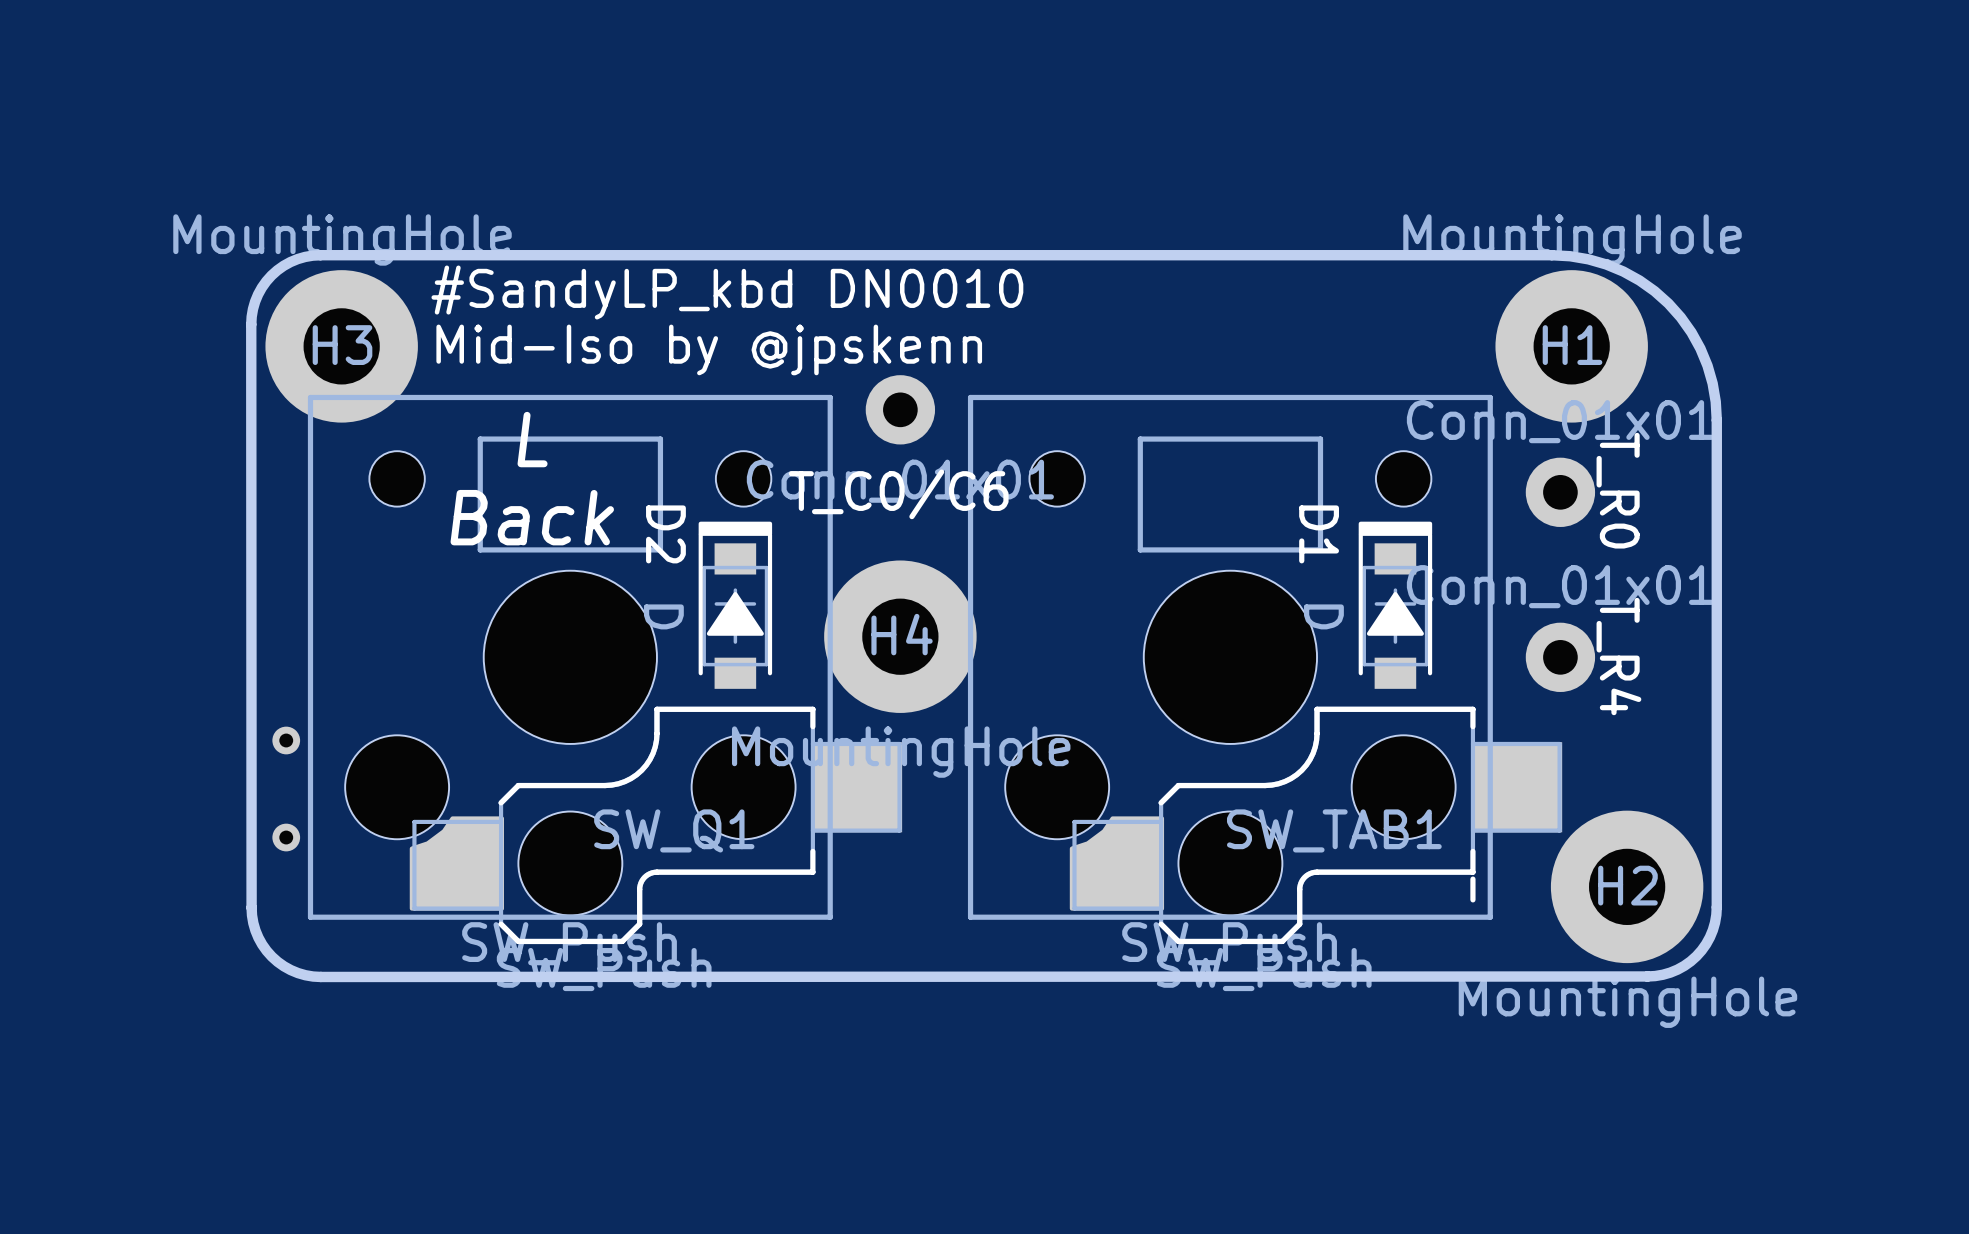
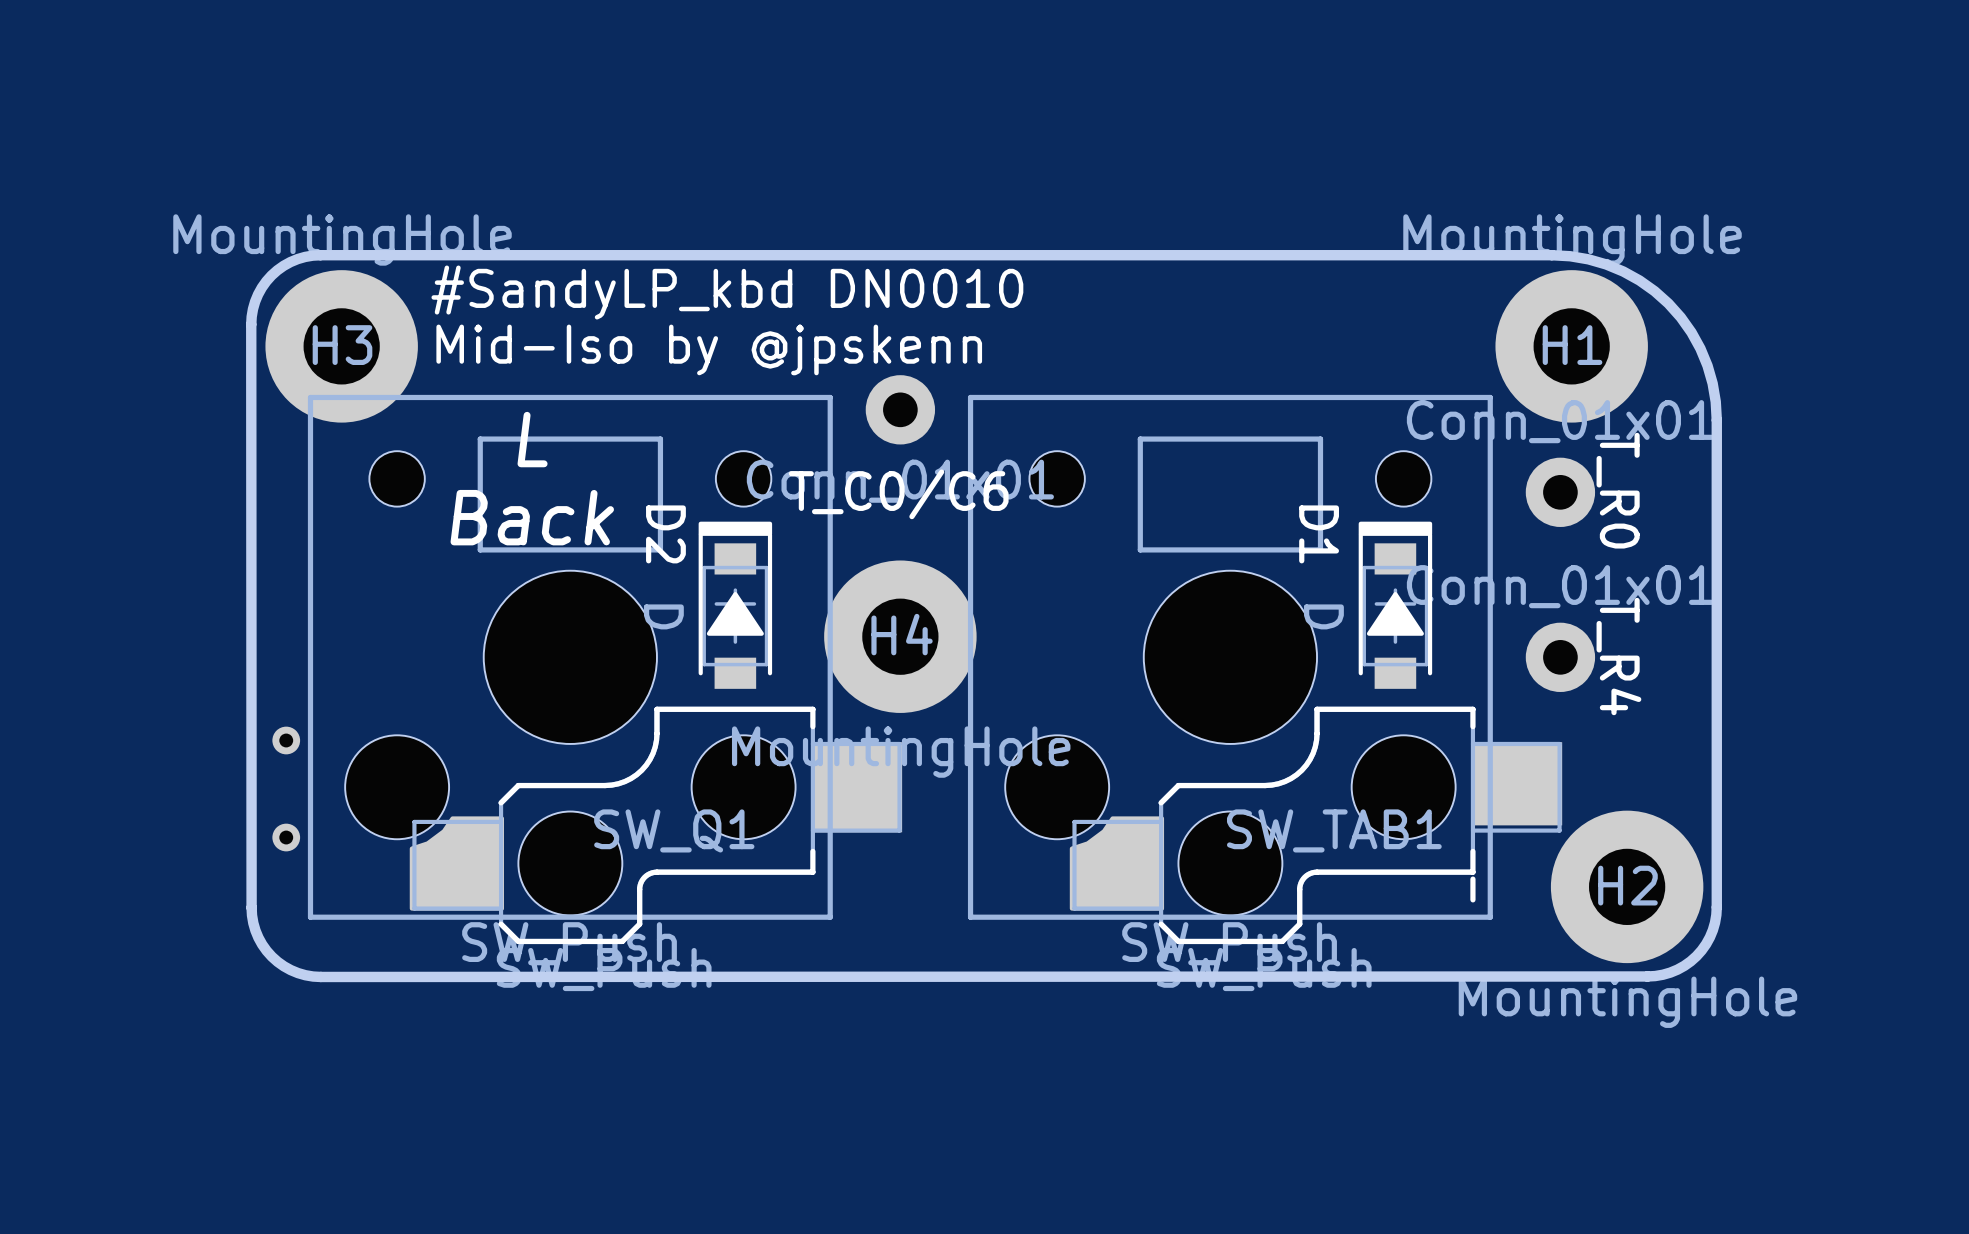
SW_TAB1 footprint: [1029, 451, 1563, 945] -> [1029, 451, 1563, 945]

